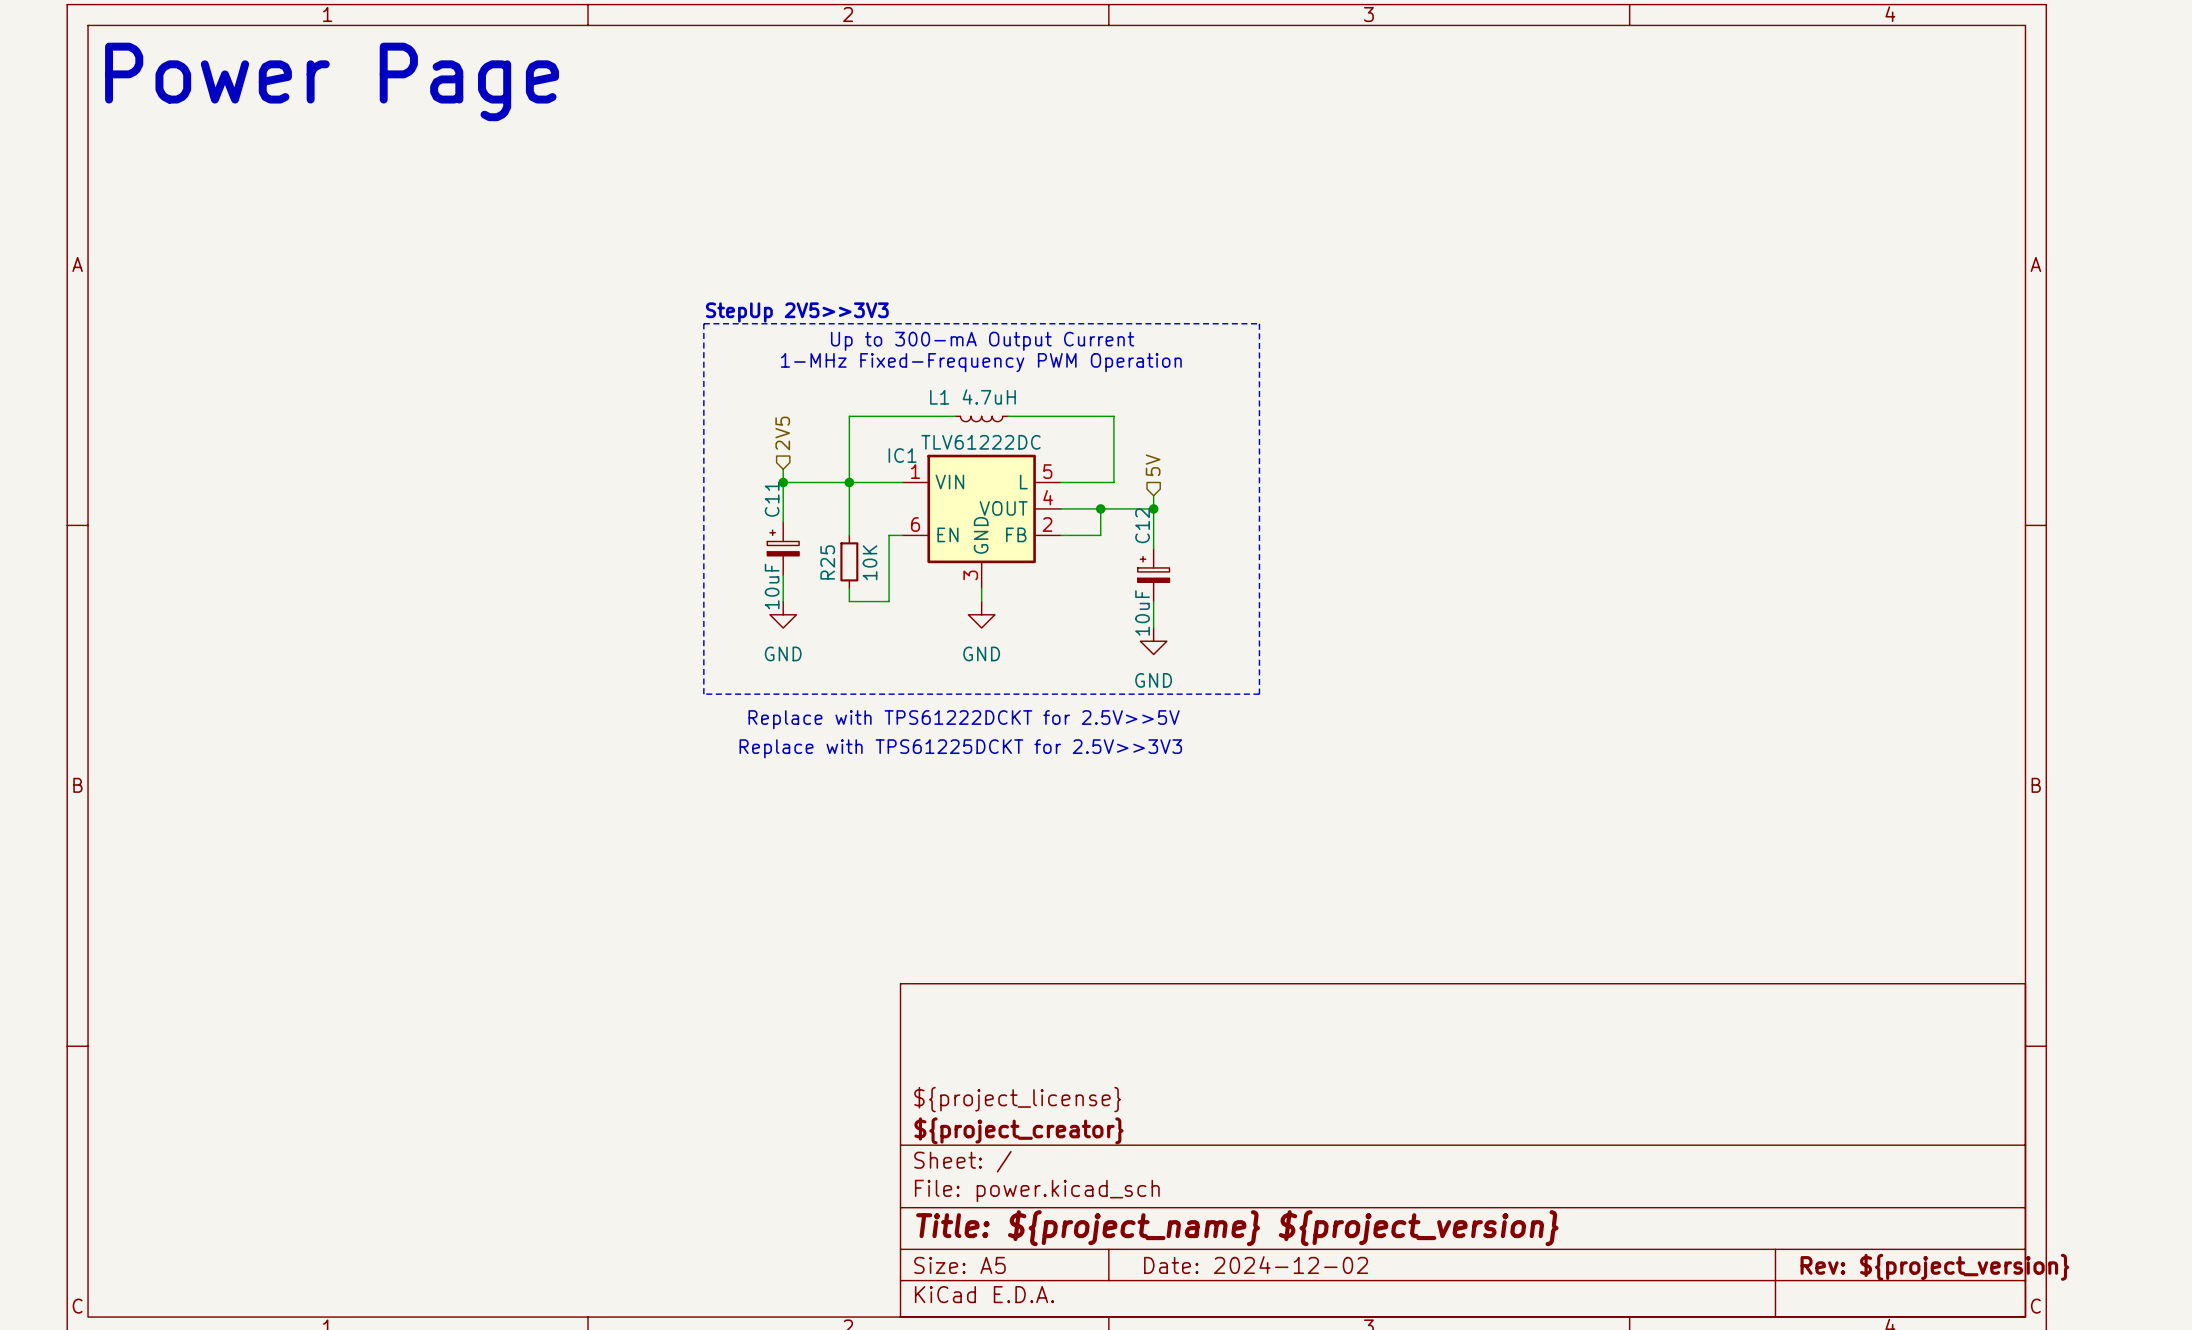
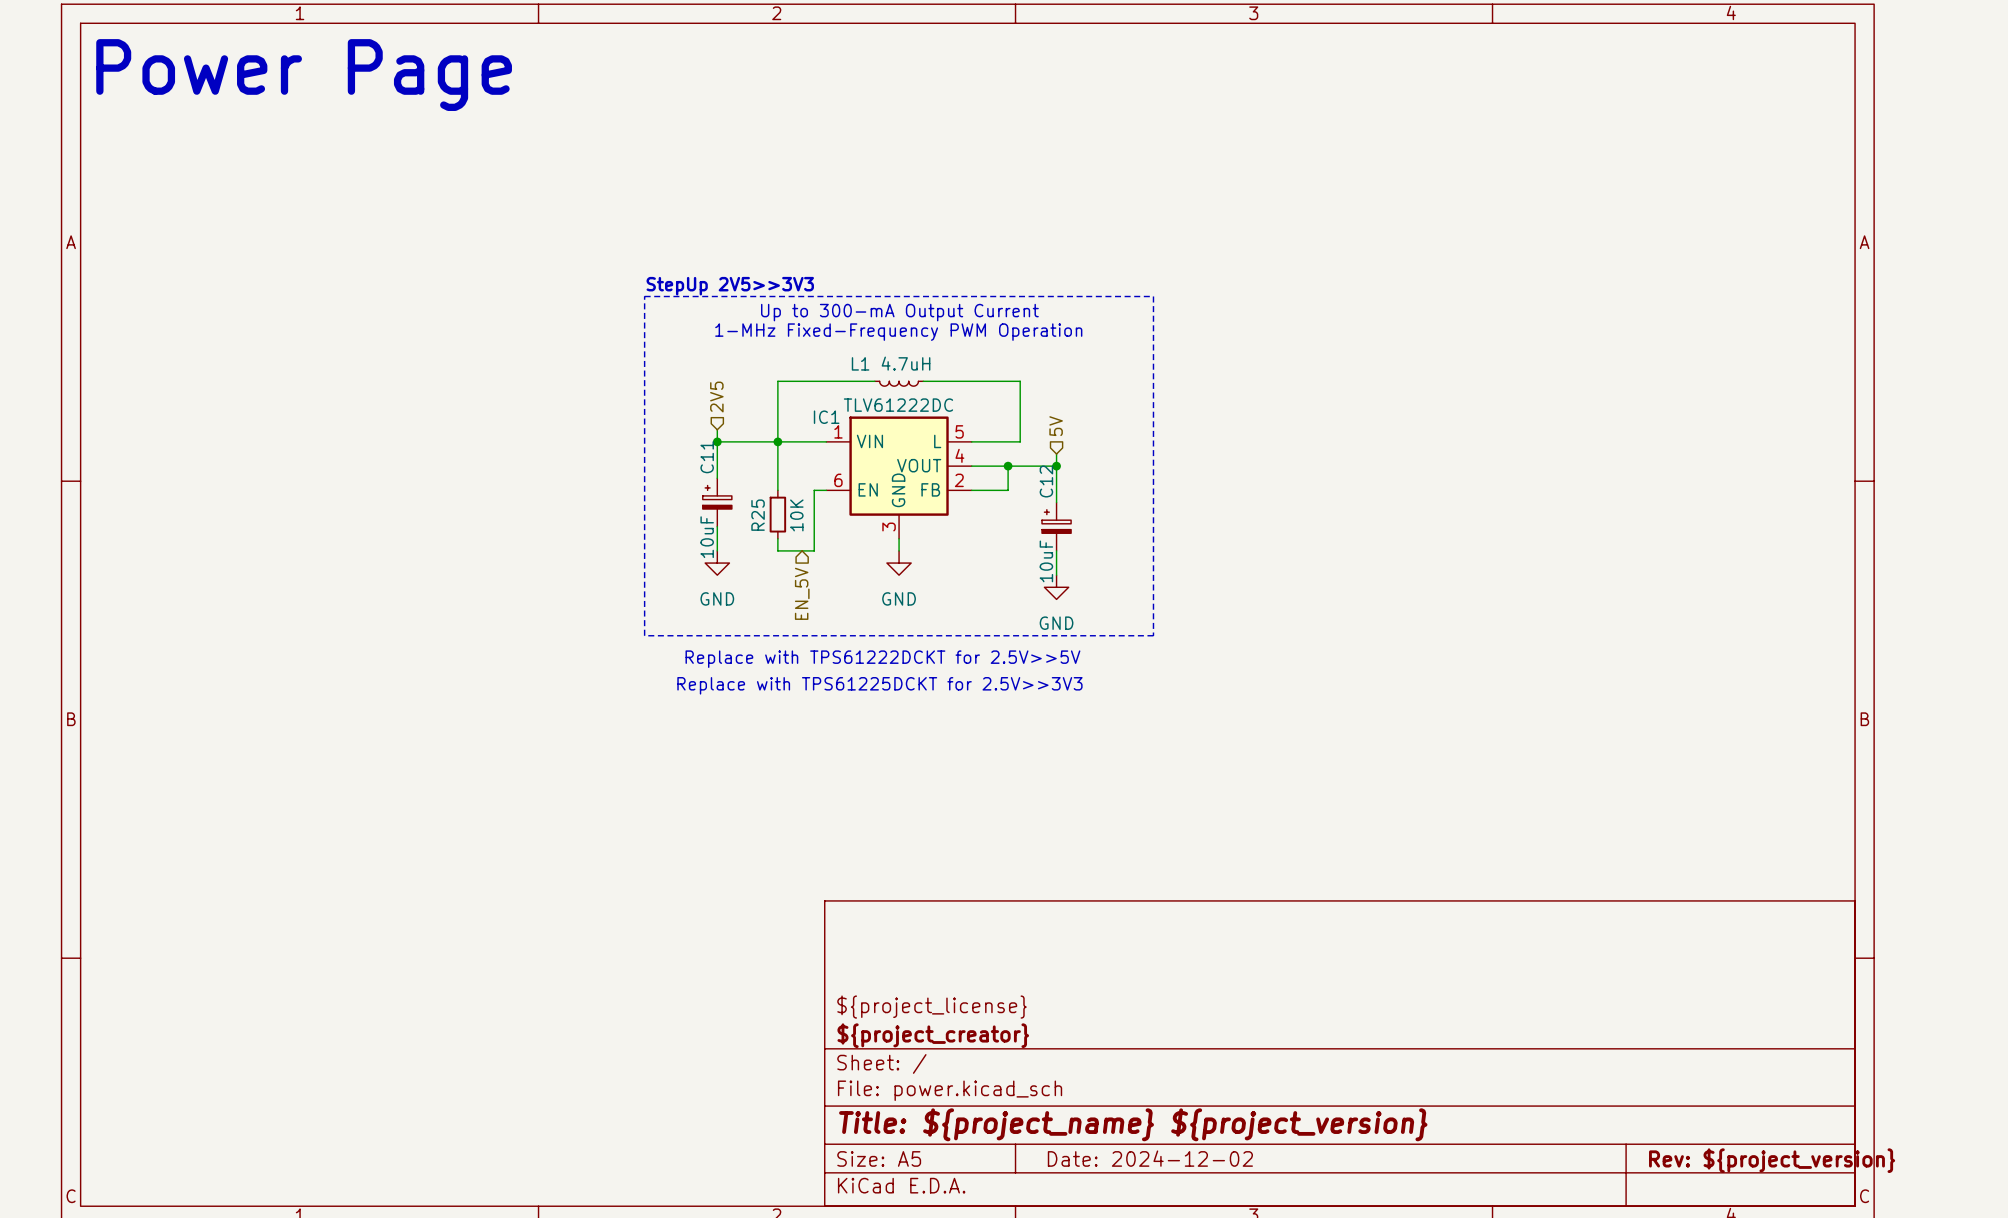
hierarchical label: none -> EN_5V (802, 593)

